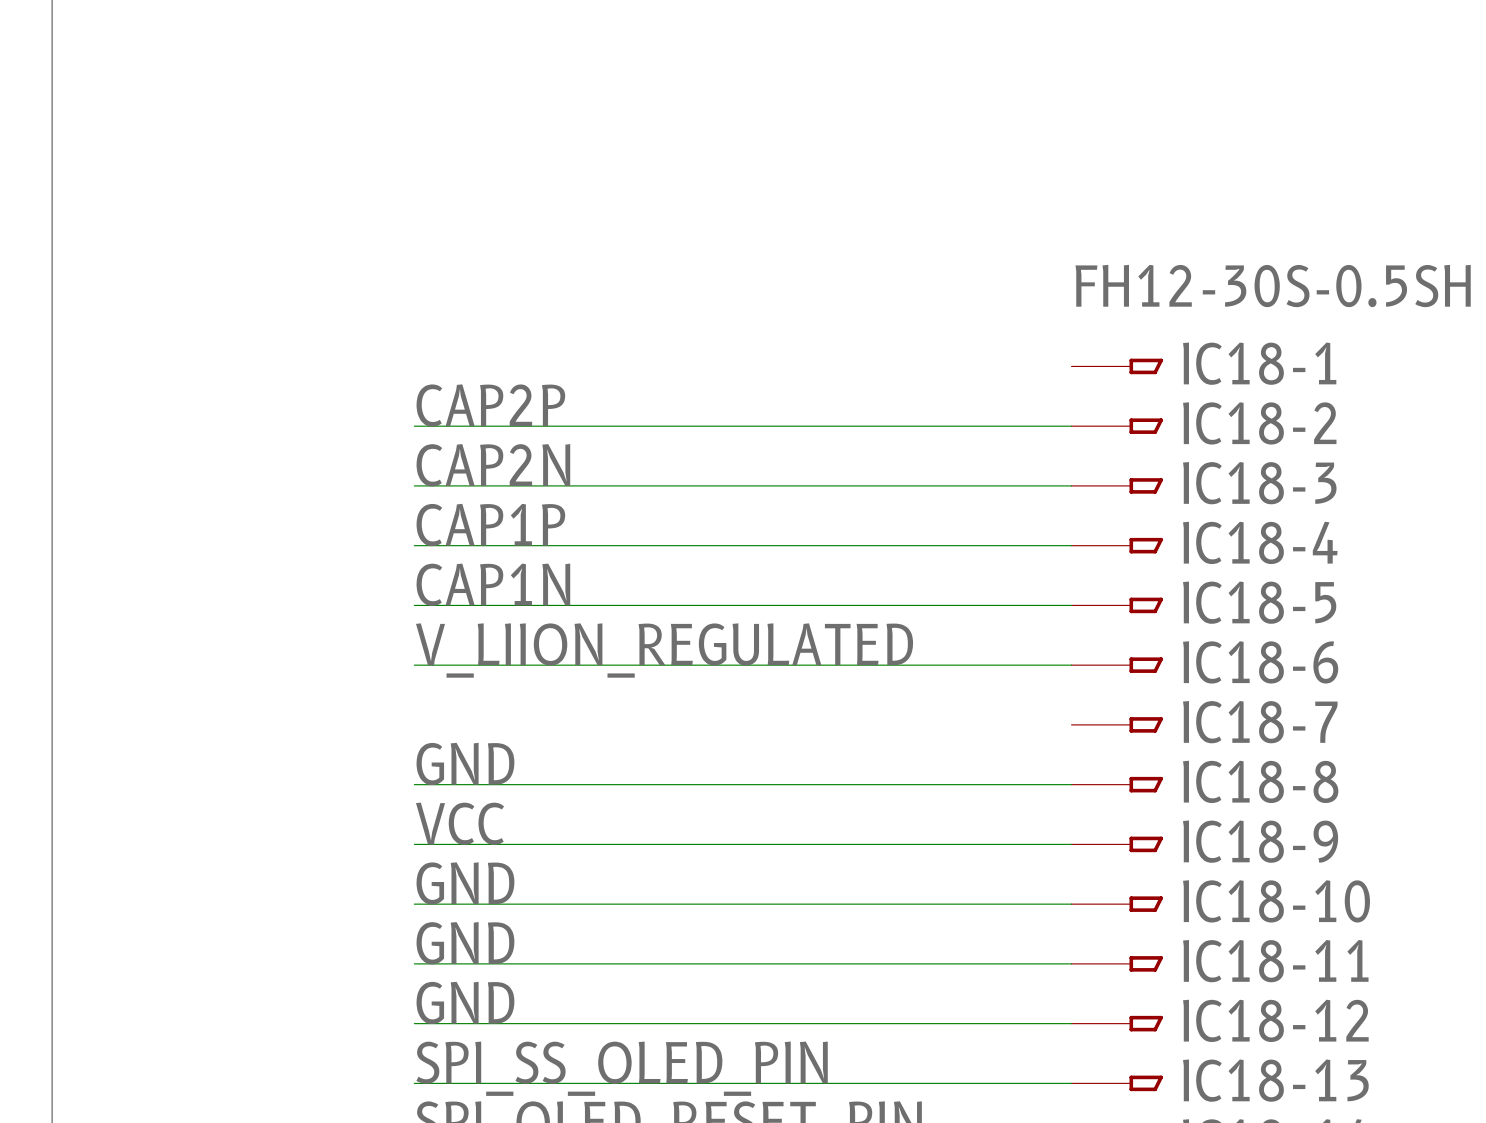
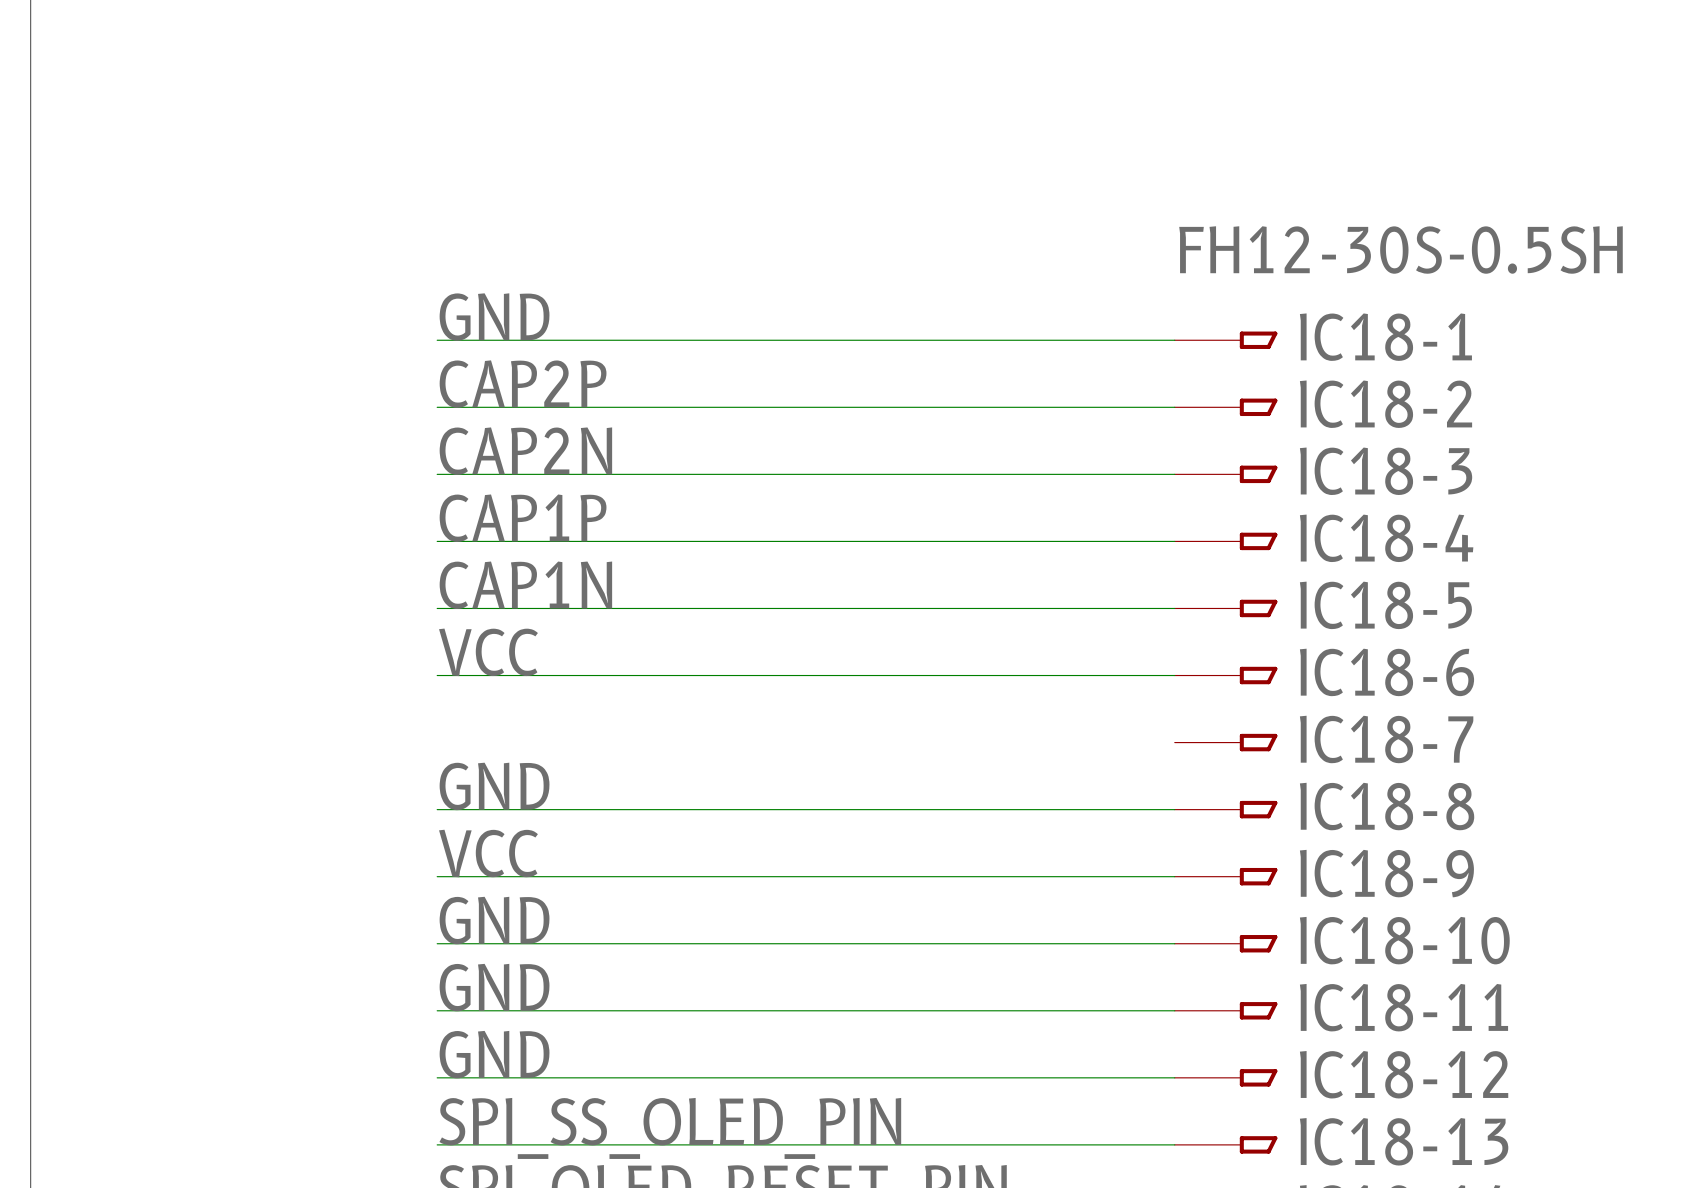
label: none -> GND (494, 317)
wire: none -> (437, 340) (1174, 340)
label: V_LIION_REGULATED (664, 650) -> VCC (488, 652)

